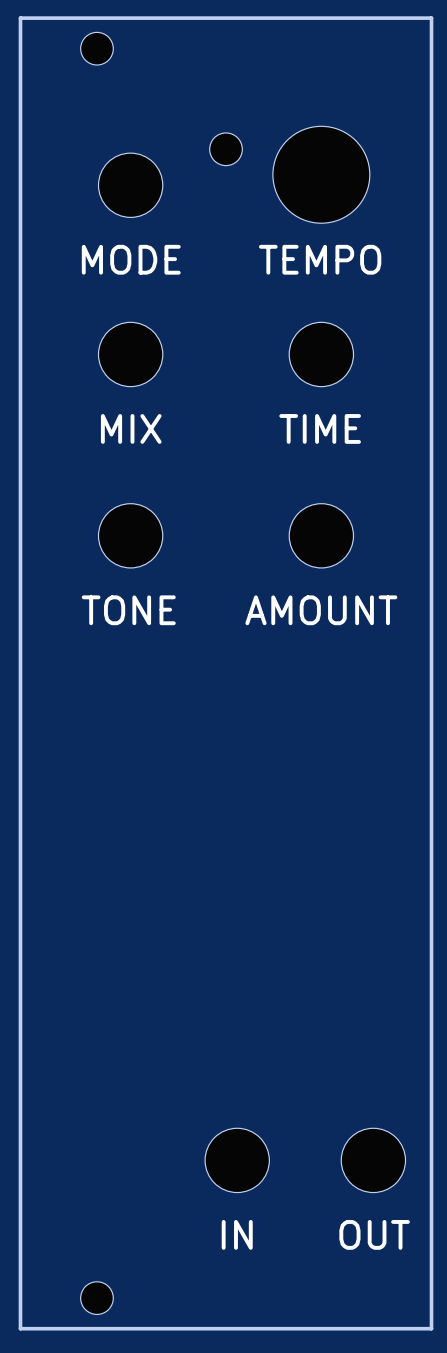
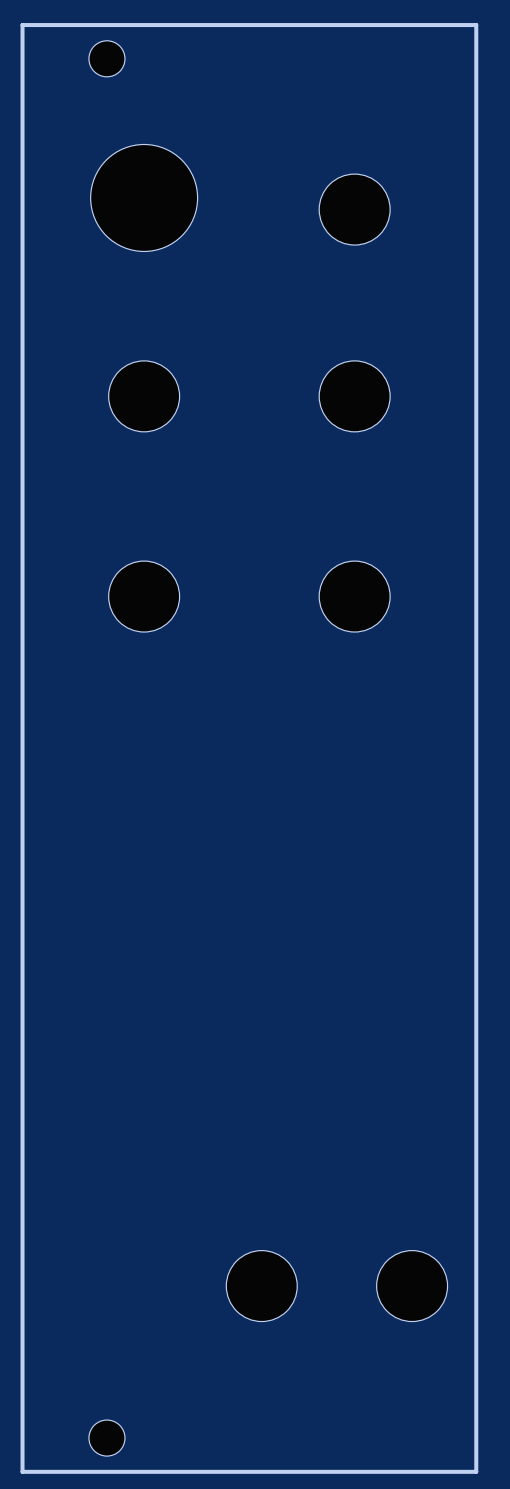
part: (226, 149) -> none
part position: (321, 174) -> (144, 197)
part position: (130, 185) -> (354, 209)
text: MODE (131, 259) -> none
text: TEMPO (320, 259) -> none
text: MIX (131, 428) -> none
text: TIME (320, 428) -> none
text: TONE (128, 610) -> none
text: AMOUNT (321, 610) -> none
text: IN (237, 1234) -> none
text: OUT (374, 1234) -> none

